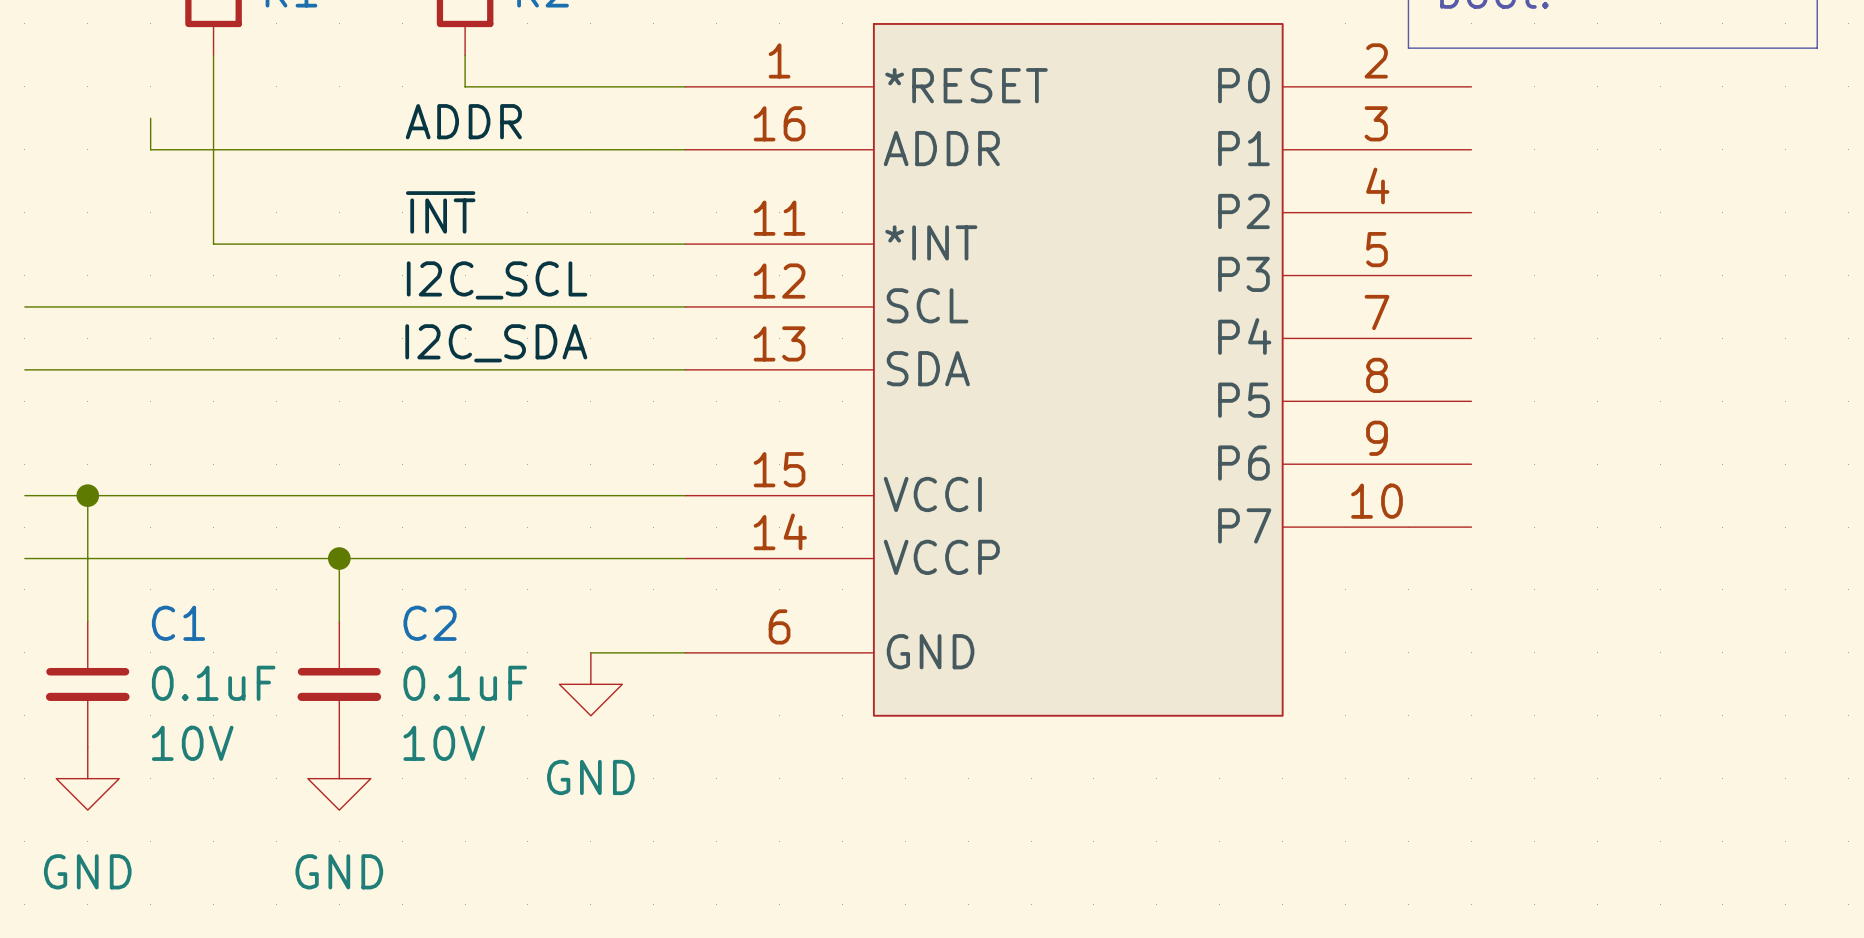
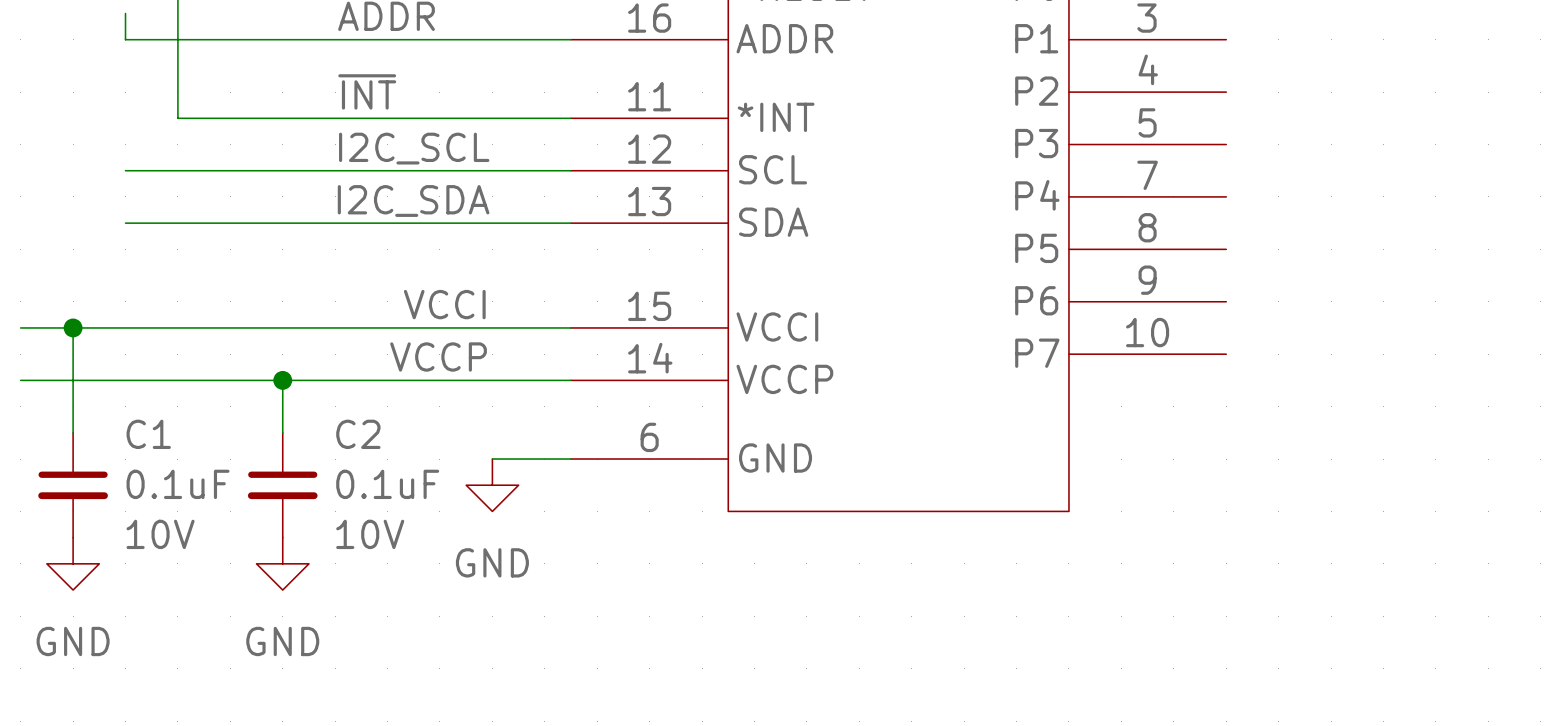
wire: (24, 306) (150, 306) -> none
wire: (24, 369) (150, 369) -> none
label: none -> VCCI (444, 304)
label: none -> VCCP (438, 357)

